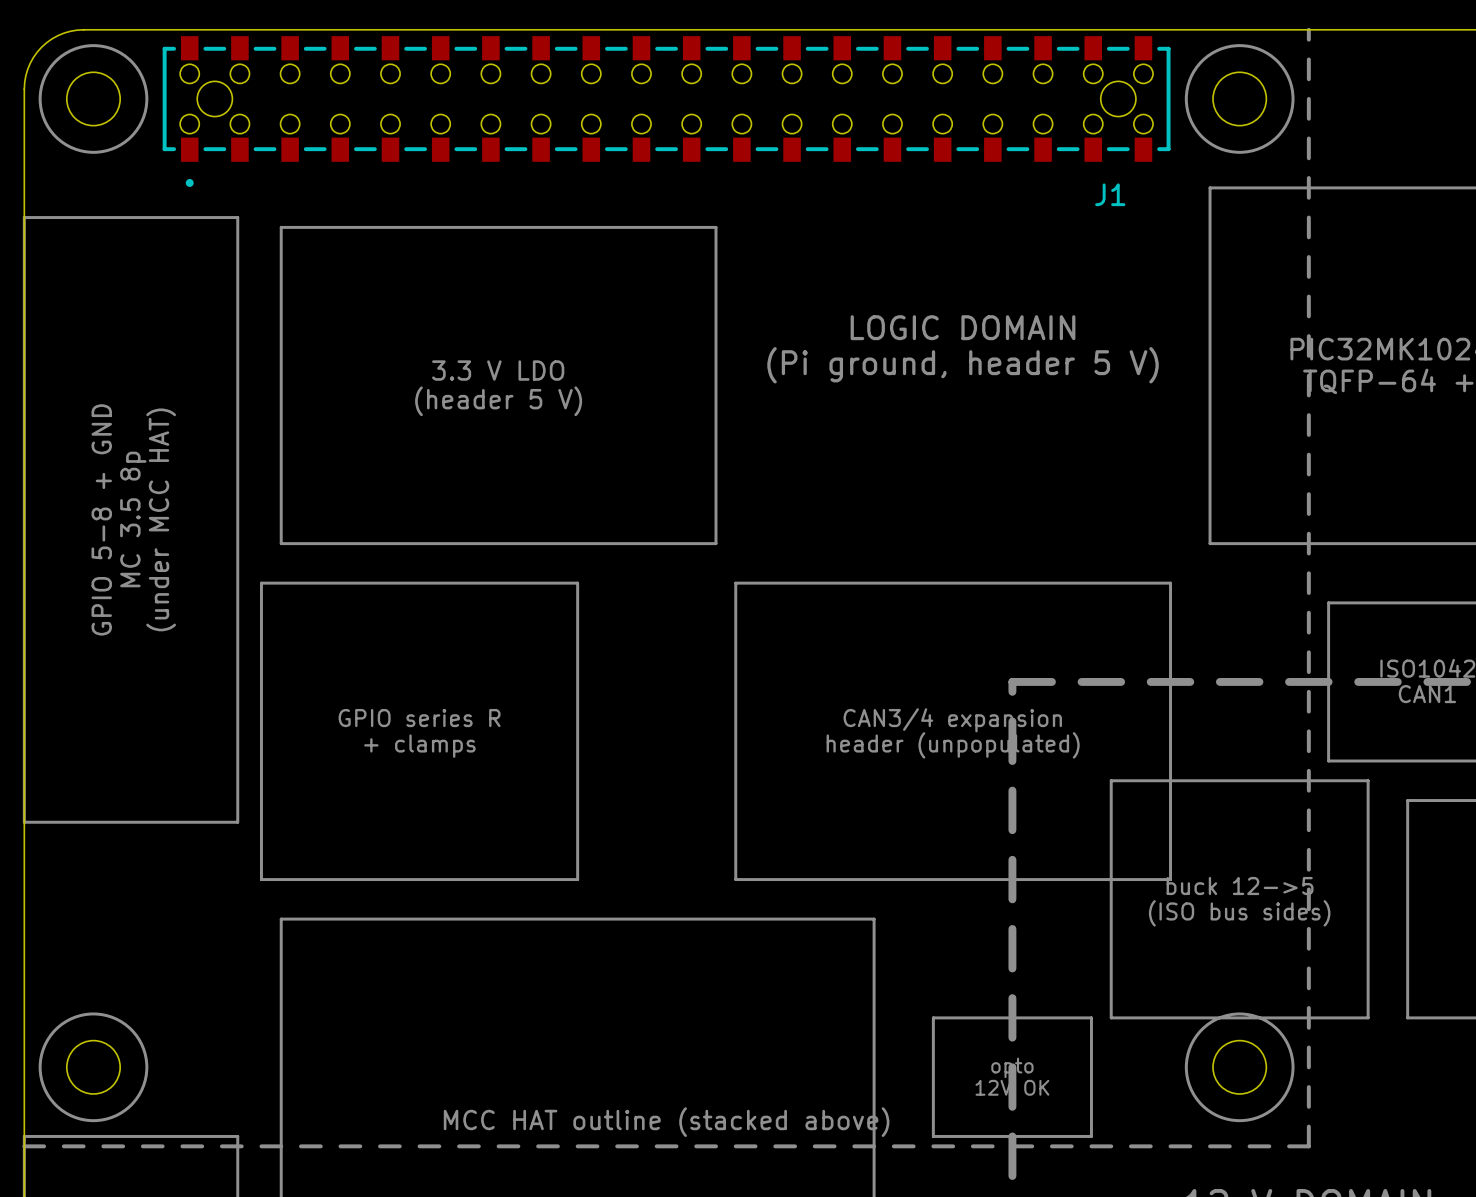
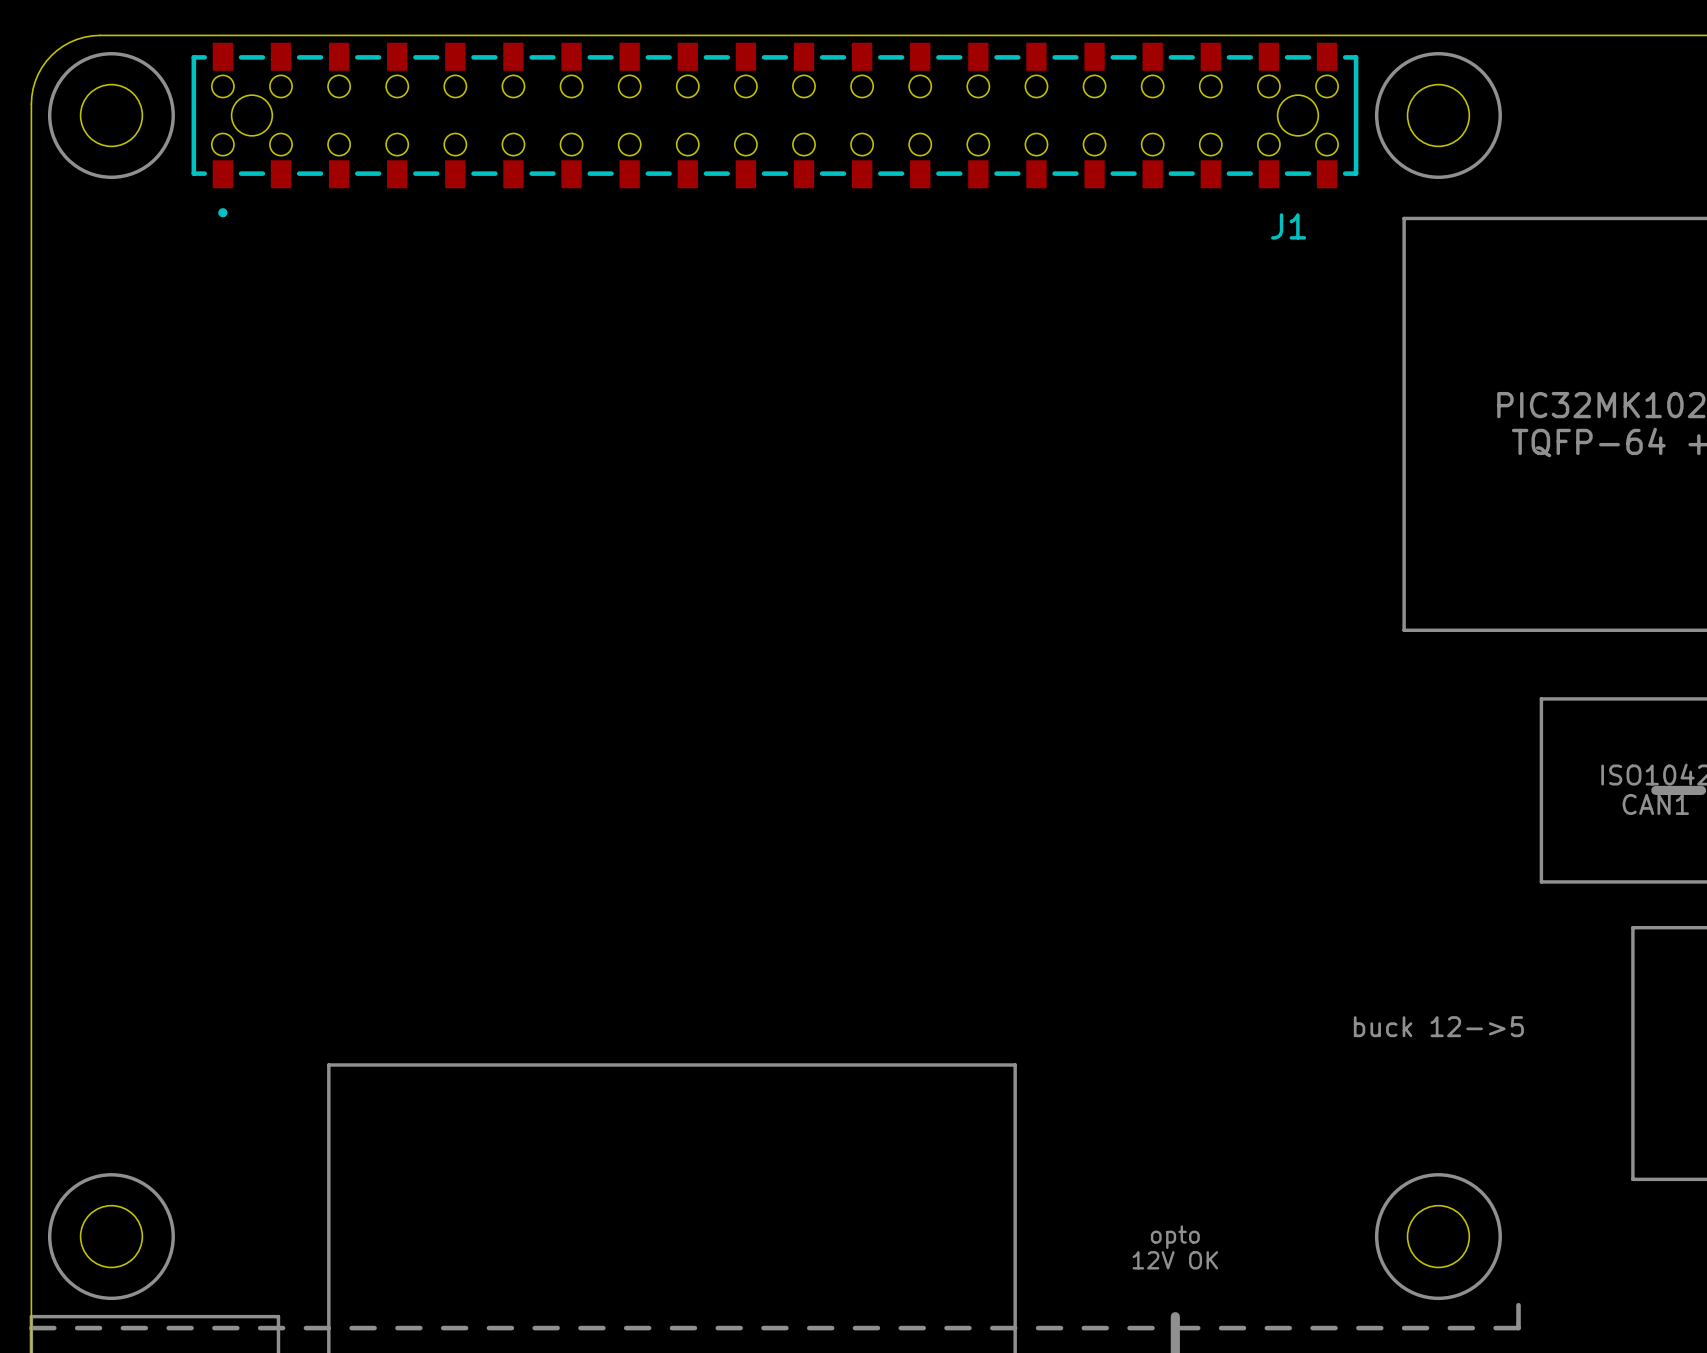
line: (1308, 29) (1308, 39) -> none
line: (1308, 59) (1308, 79) -> none
line: (1308, 98) (1308, 118) -> none
line: (1308, 138) (1308, 158) -> none
line: (1308, 178) (1308, 197) -> none
line: (24, 217) (237, 217) (237, 822) (24, 822) (24, 217) -> none
line: (1308, 217) (1308, 237) -> none
line: (281, 227) (715, 227) (715, 543) (281, 543) (281, 227) -> none
line: (1308, 257) (1308, 276) -> none
line: (1308, 296) (1308, 316) -> none
text: LOGIC DOMAIN (963, 327) -> none
line: (1308, 336) (1308, 355) -> none
text: (Pi ground, header 5 V) (963, 365) -> none
text: 3.3 V LDO (498, 370) -> none
line: (1308, 375) (1308, 395) -> none
text: (header 5 V) (498, 401) -> none
line: (1308, 415) (1308, 434) -> none
line: (1308, 454) (1308, 474) -> none
line: (1308, 494) (1308, 513) -> none
text: GPIO 5-8 + GND (101, 519) -> none
text: MC 3.5 8p (133, 519) -> none
text: (under MCC HAT) (161, 519) -> none
line: (1308, 533) (1308, 553) -> none
line: (1308, 573) (1308, 593) -> none
line: (261, 583) (577, 583) (577, 879) (261, 879) (261, 583) -> none
line: (735, 583) (1170, 583) (1170, 879) (735, 879) (735, 583) -> none
line: (1308, 612) (1308, 632) -> none
line: (1308, 652) (1308, 672) -> none
line: (1051, 681) (1012, 681) (1012, 691) -> none
line: (1081, 681) (1121, 681) -> none
line: (1150, 681) (1190, 681) -> none
line: (1219, 681) (1259, 681) -> none
line: (1289, 681) (1328, 681) -> none
line: (1358, 681) (1397, 681) -> none
line: (1308, 691) (1308, 711) -> none
text: GPIO series R (419, 718) -> none
text: CAN3/4 expansion (952, 720) -> none
line: (1012, 721) (1012, 760) -> none
line: (1308, 731) (1308, 751) -> none
text: header (unpopulated) (953, 745) -> none
text: + clamps (419, 746) -> none
line: (1308, 770) (1308, 790) -> none
line: (1111, 780) (1368, 780) (1368, 1017) (1111, 1017) (1111, 780) -> none
line: (1012, 790) (1012, 830) -> none
line: (1308, 810) (1308, 830) -> none
line: (1308, 849) (1308, 869) -> none
line: (1012, 859) (1012, 899) -> none
line: (1308, 889) (1308, 909) -> none
text: (ISO bus sides) (1239, 913) -> none
line: (1012, 928) (1012, 968) -> none
line: (1308, 928) (1308, 948) -> none
line: (1308, 968) (1308, 988) -> none
line: (1012, 998) (1012, 1037) -> none
line: (1308, 1008) (1308, 1027) -> none
line: (933, 1017) (1091, 1017) (1091, 1136) (933, 1136) (933, 1017) -> none
line: (1308, 1047) (1308, 1067) -> none
line: (1012, 1067) (1012, 1106) -> none
line: (1308, 1087) (1308, 1106) -> none
text: MCC HAT outline (stacked above) (666, 1122) -> none

